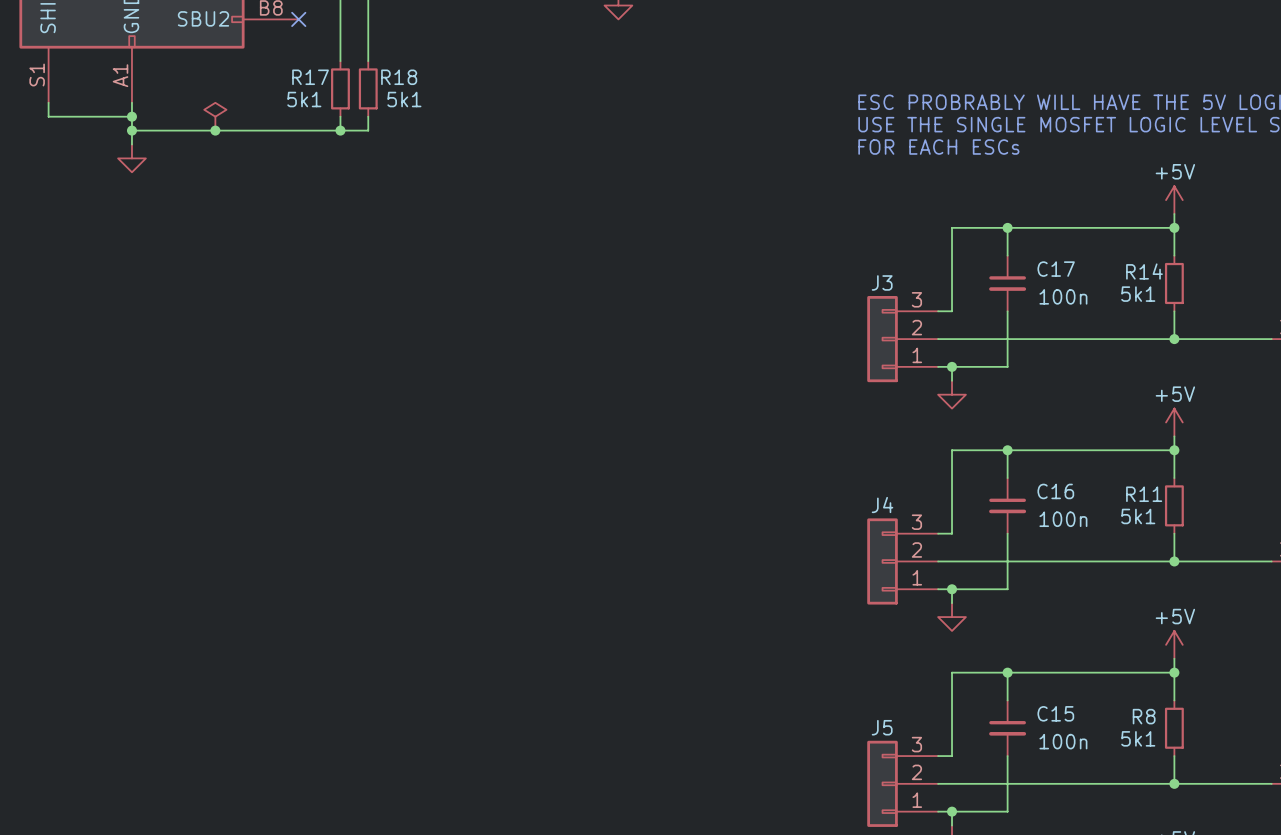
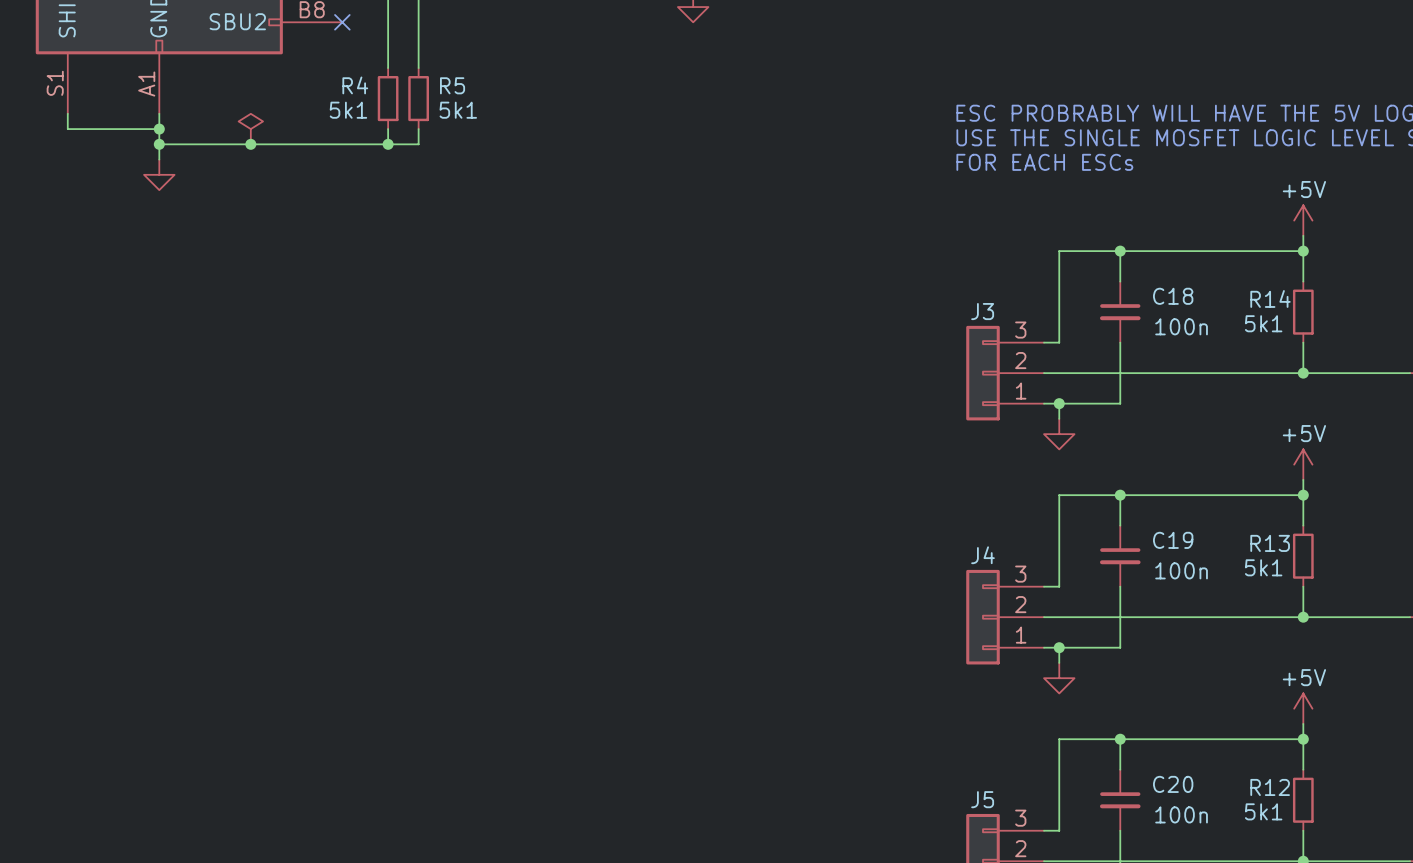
R17 name: R17 (310, 77) -> R4 (355, 85)
R18 name: R18 (399, 77) -> R5 (452, 85)
C17 name: C17 (1056, 269) -> C18 (1173, 296)
C16 name: C16 (1055, 491) -> C19 (1173, 540)
R11 name: R11 (1144, 494) -> R13 (1270, 543)
C15 name: C15 (1055, 713) -> C20 (1173, 784)
R8 name: R8 (1144, 716) -> R12 (1270, 787)

